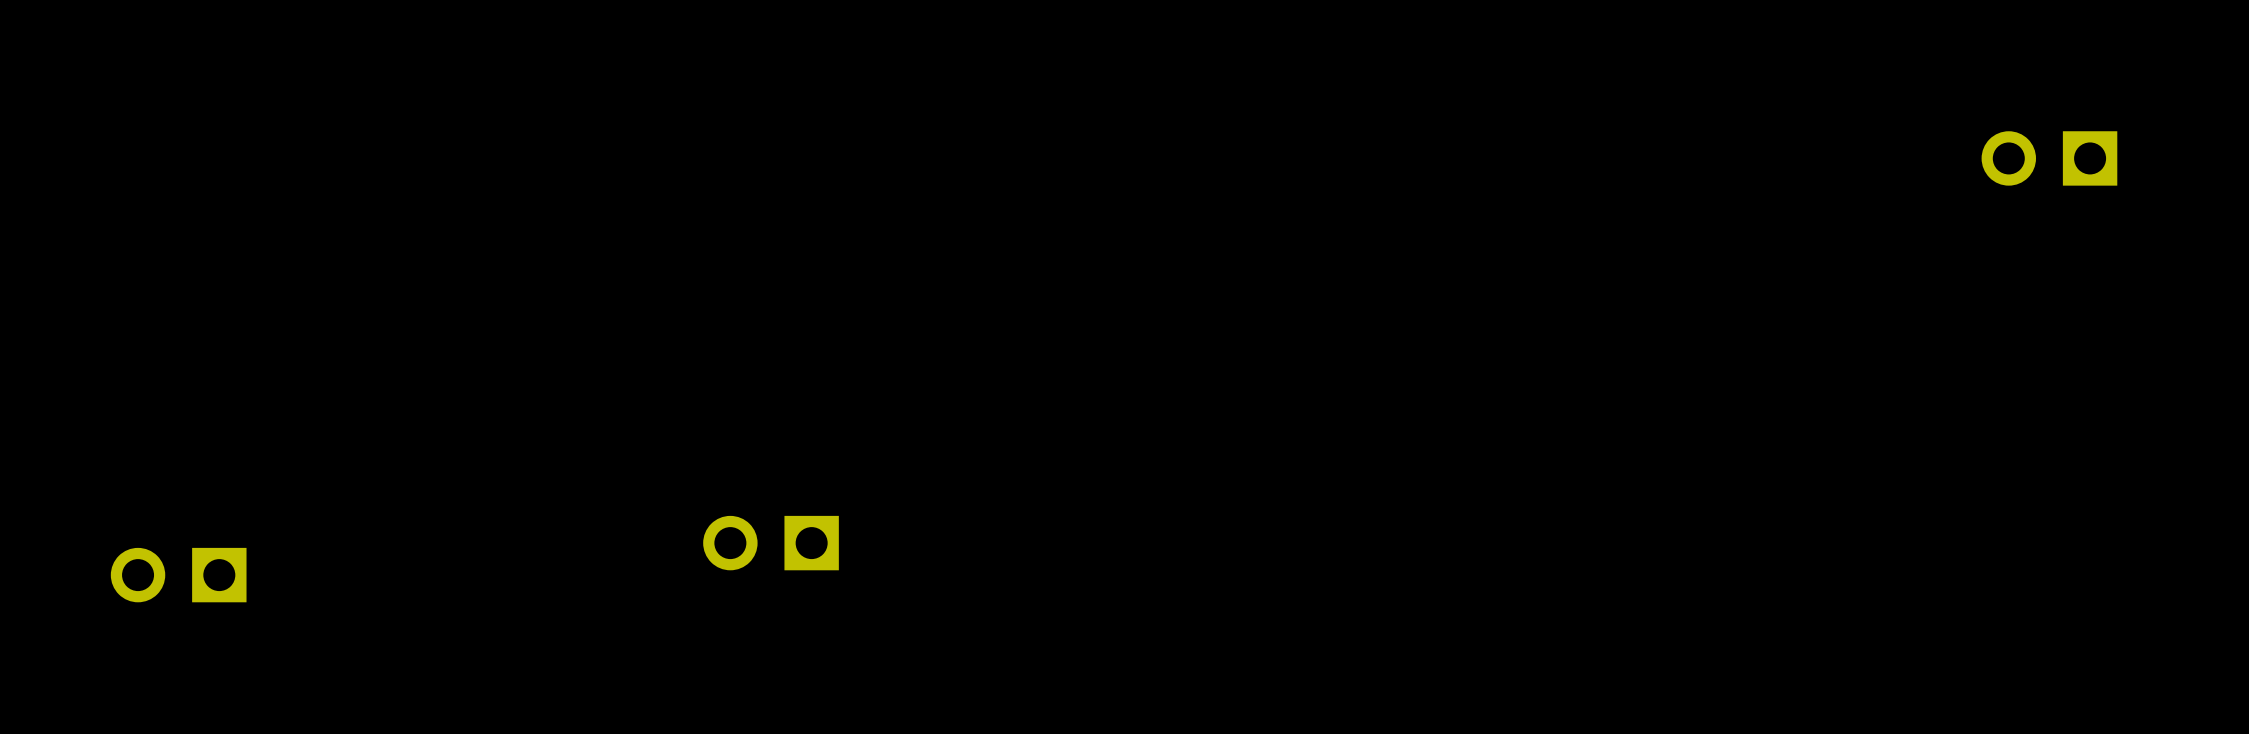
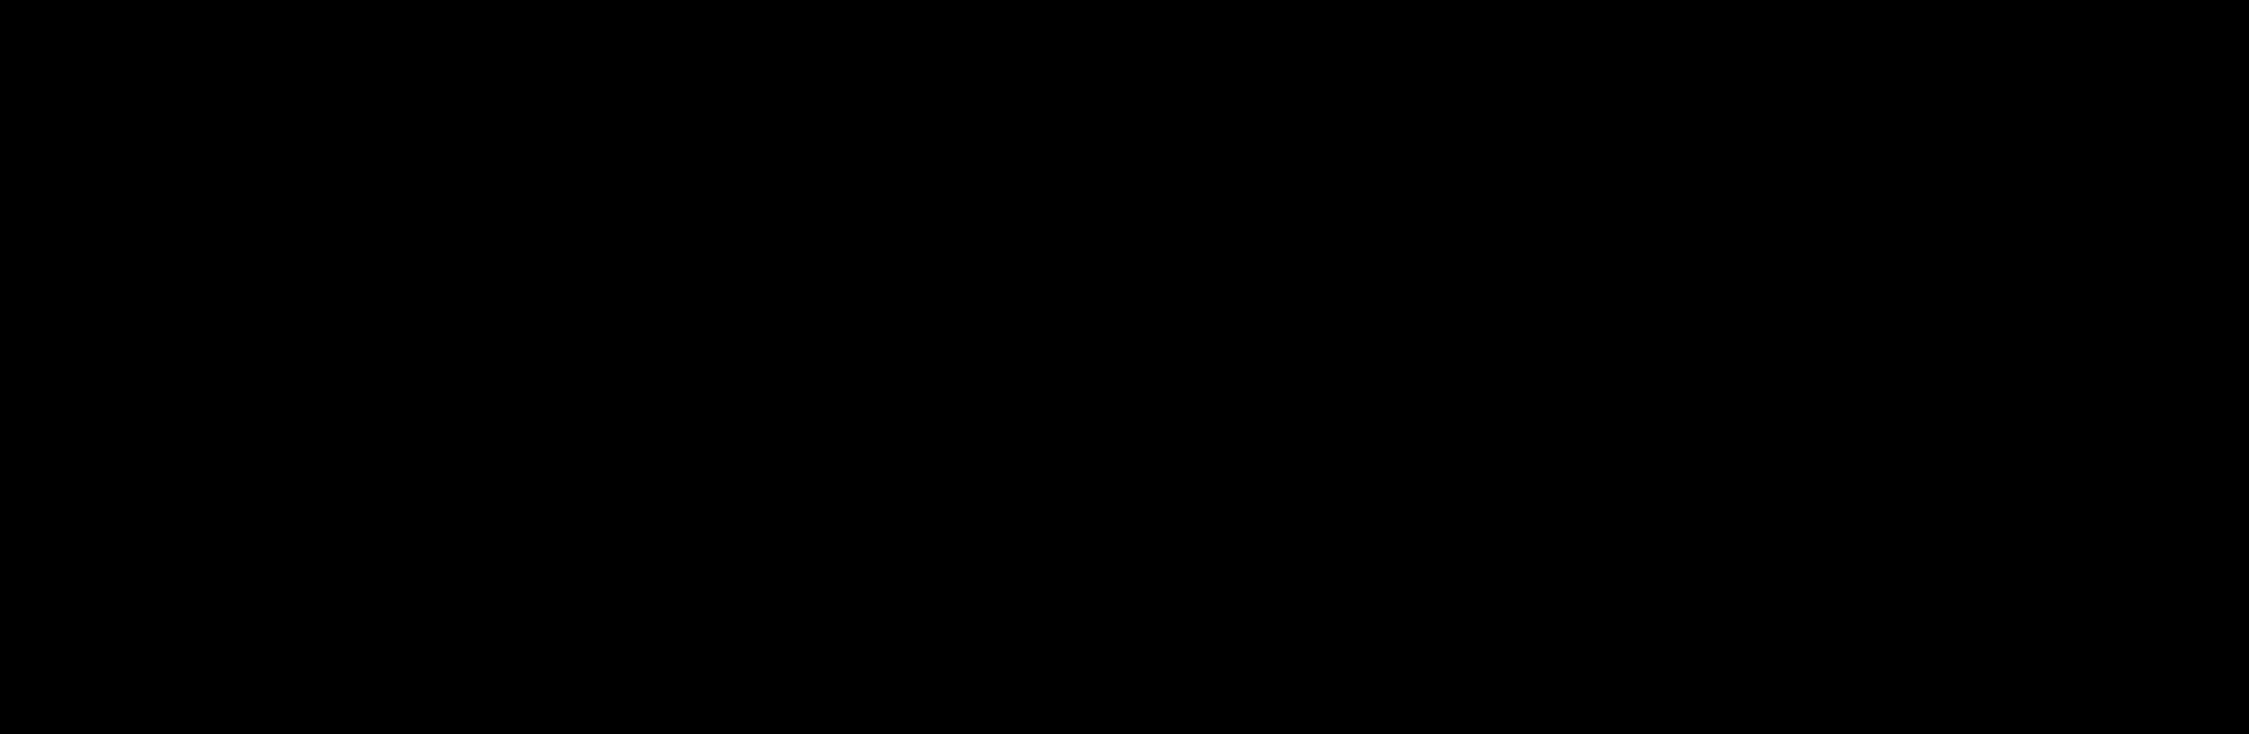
part: (2049, 158) -> none
part: (771, 543) -> none
part: (178, 575) -> none

